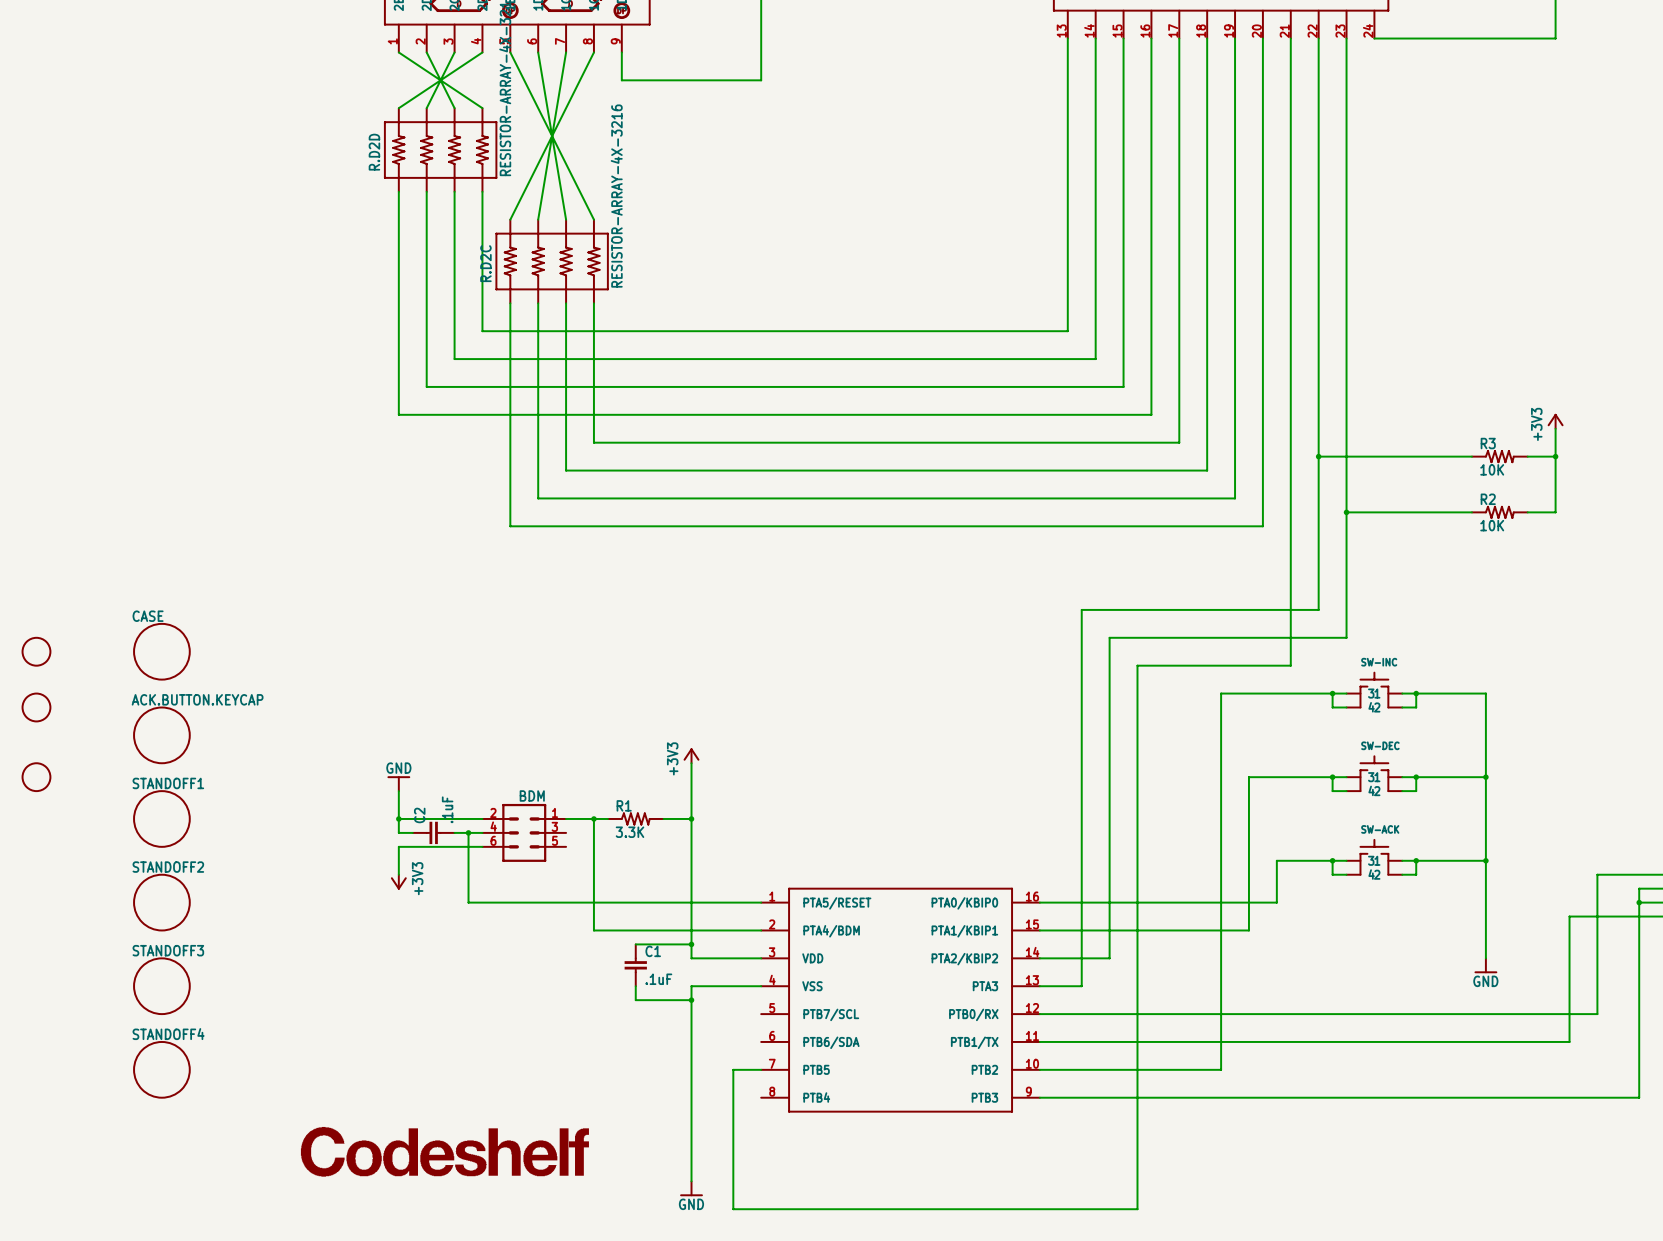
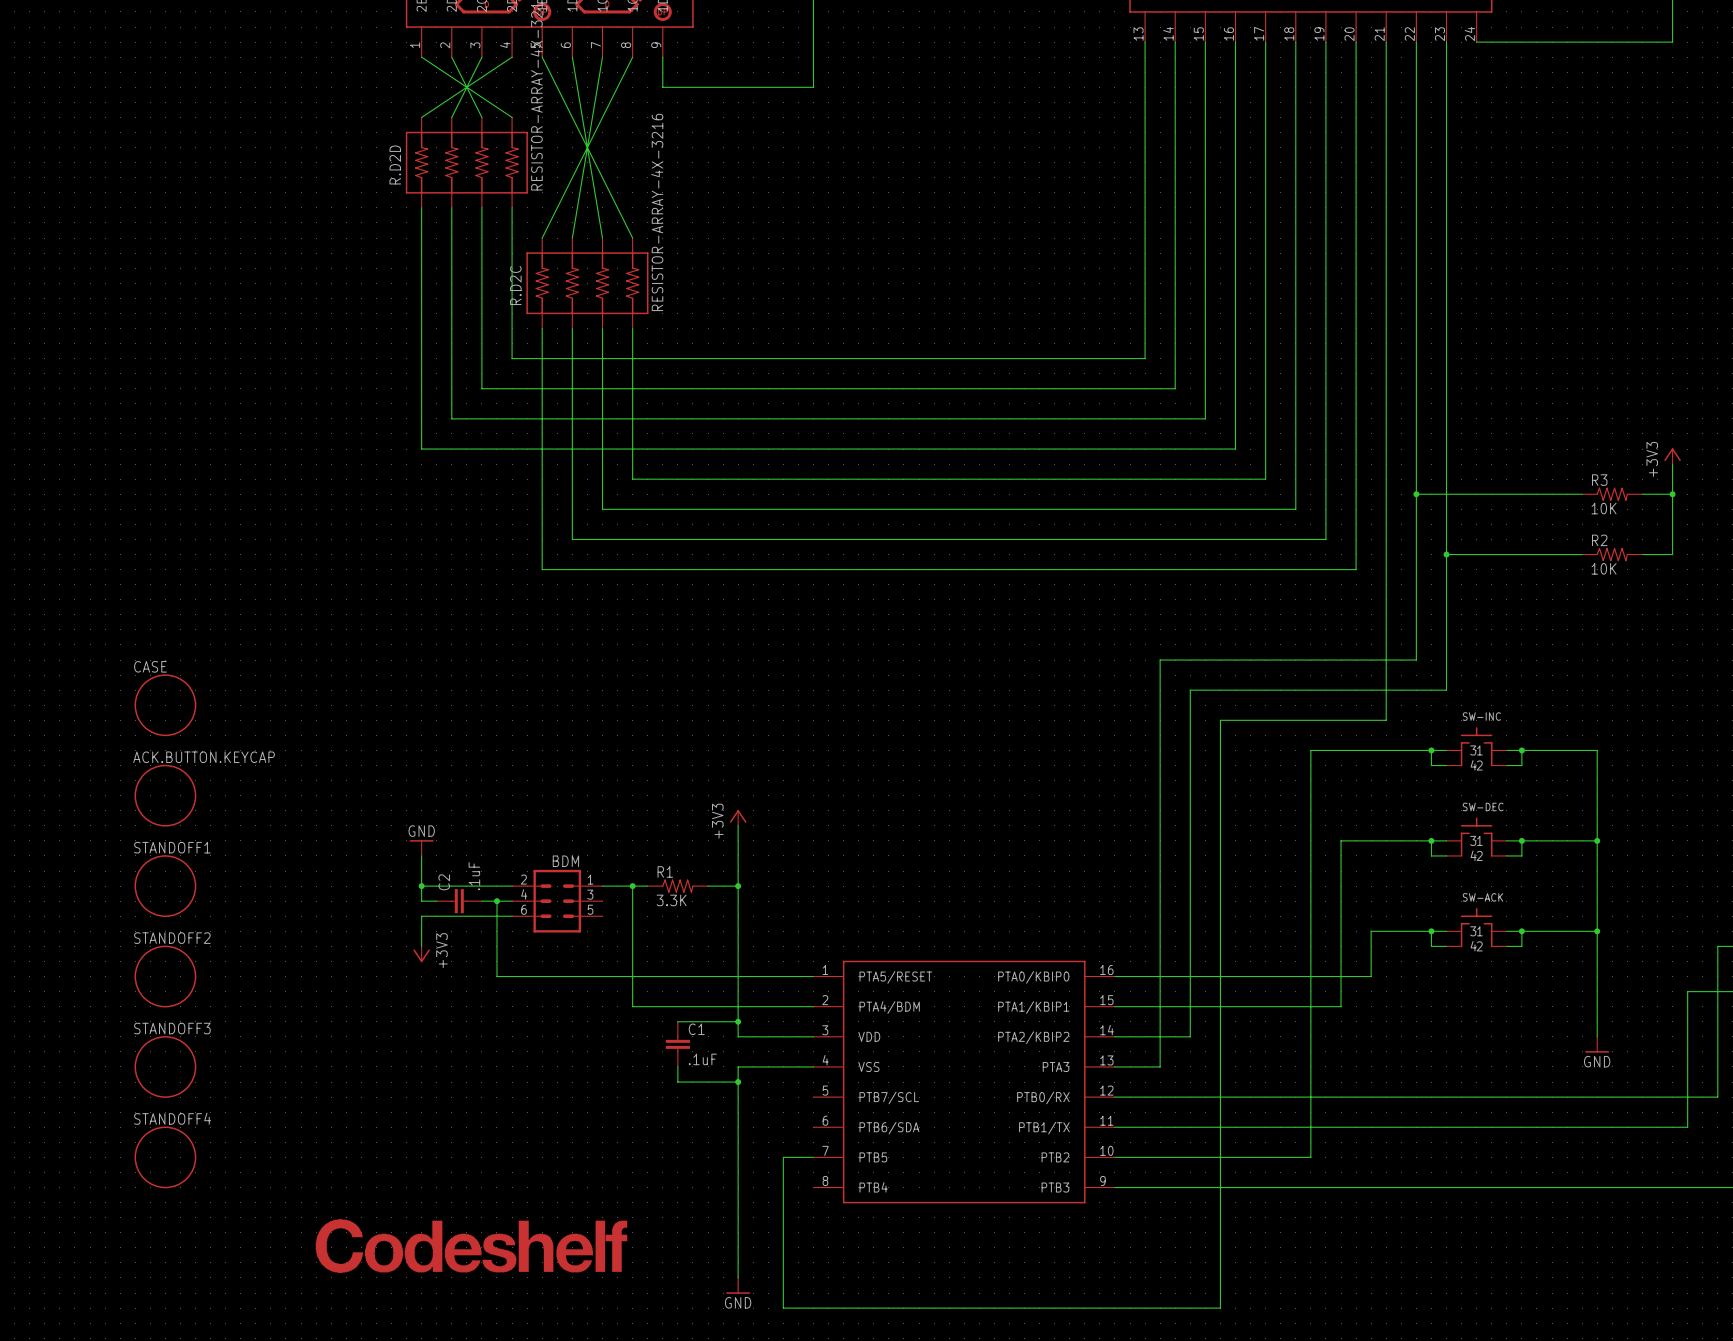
part: (36, 651) -> none
part: (36, 707) -> none
part: (36, 777) -> none

